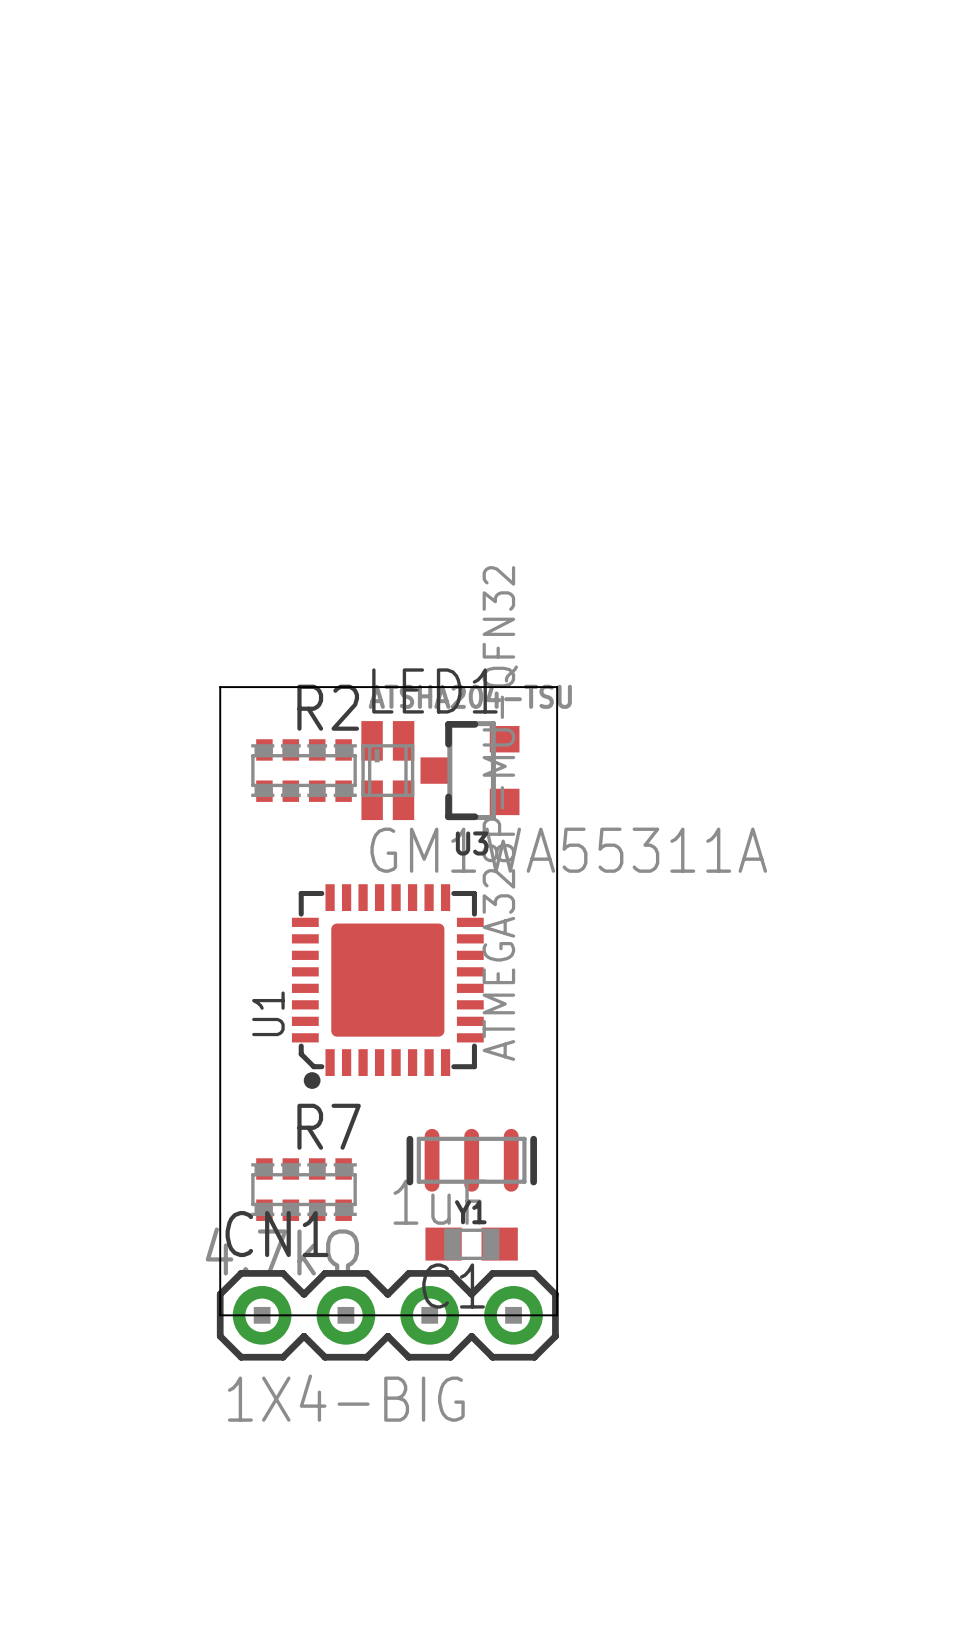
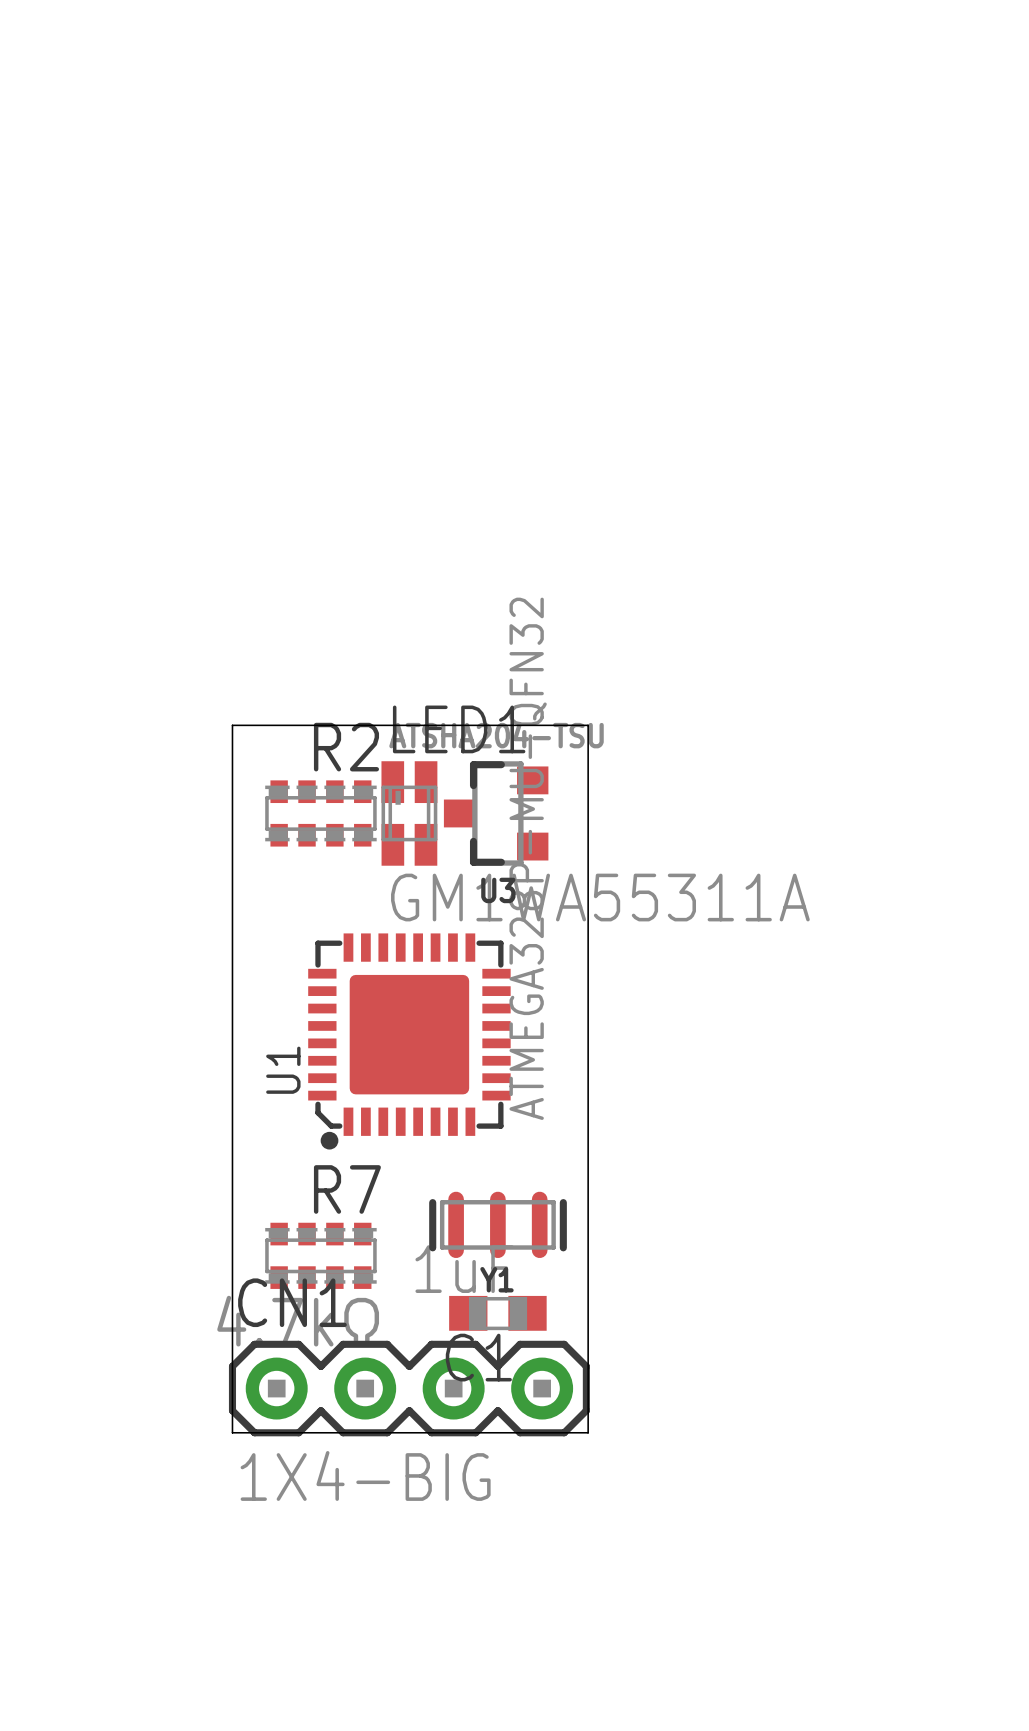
board edge: (220, 1315) (557, 1315) -> (232, 1388) (232, 1432) (588, 1432) (588, 1388)

